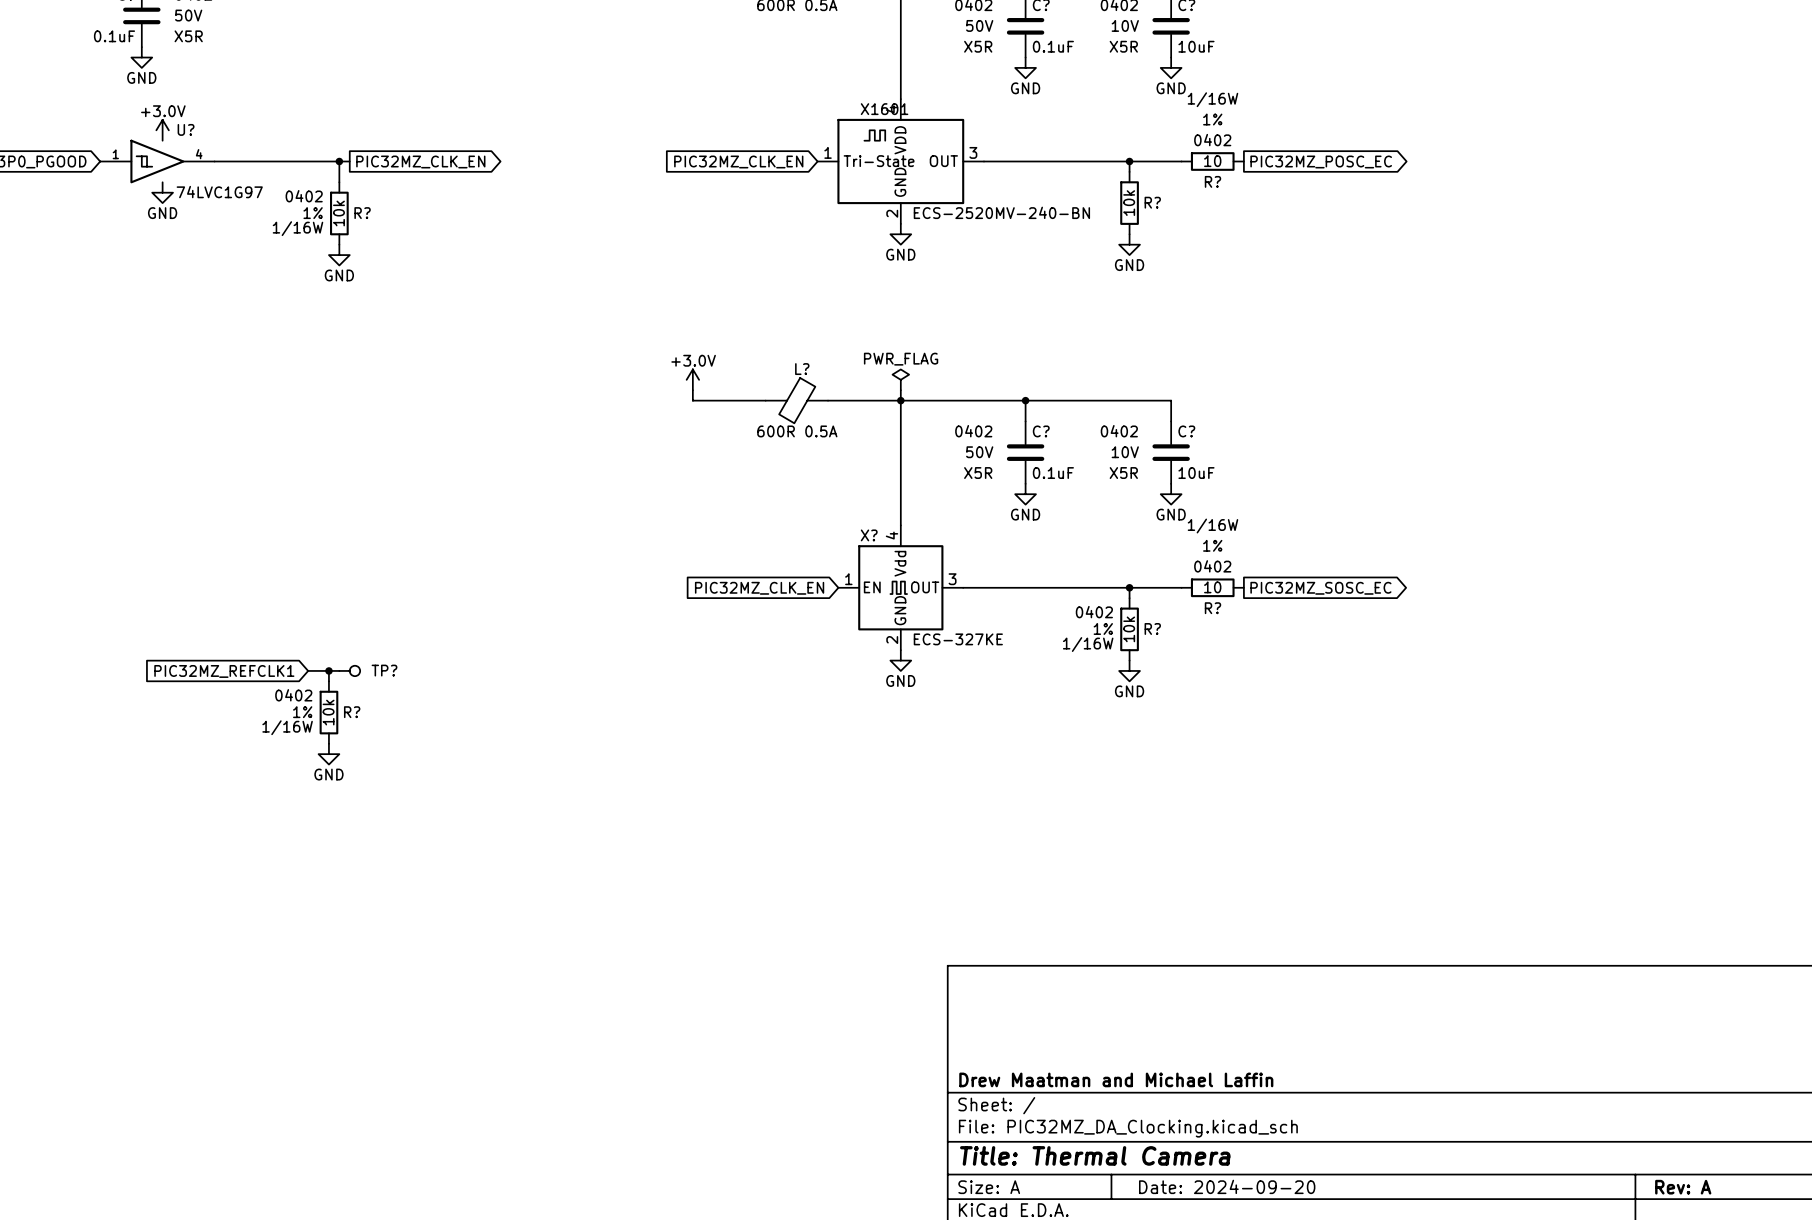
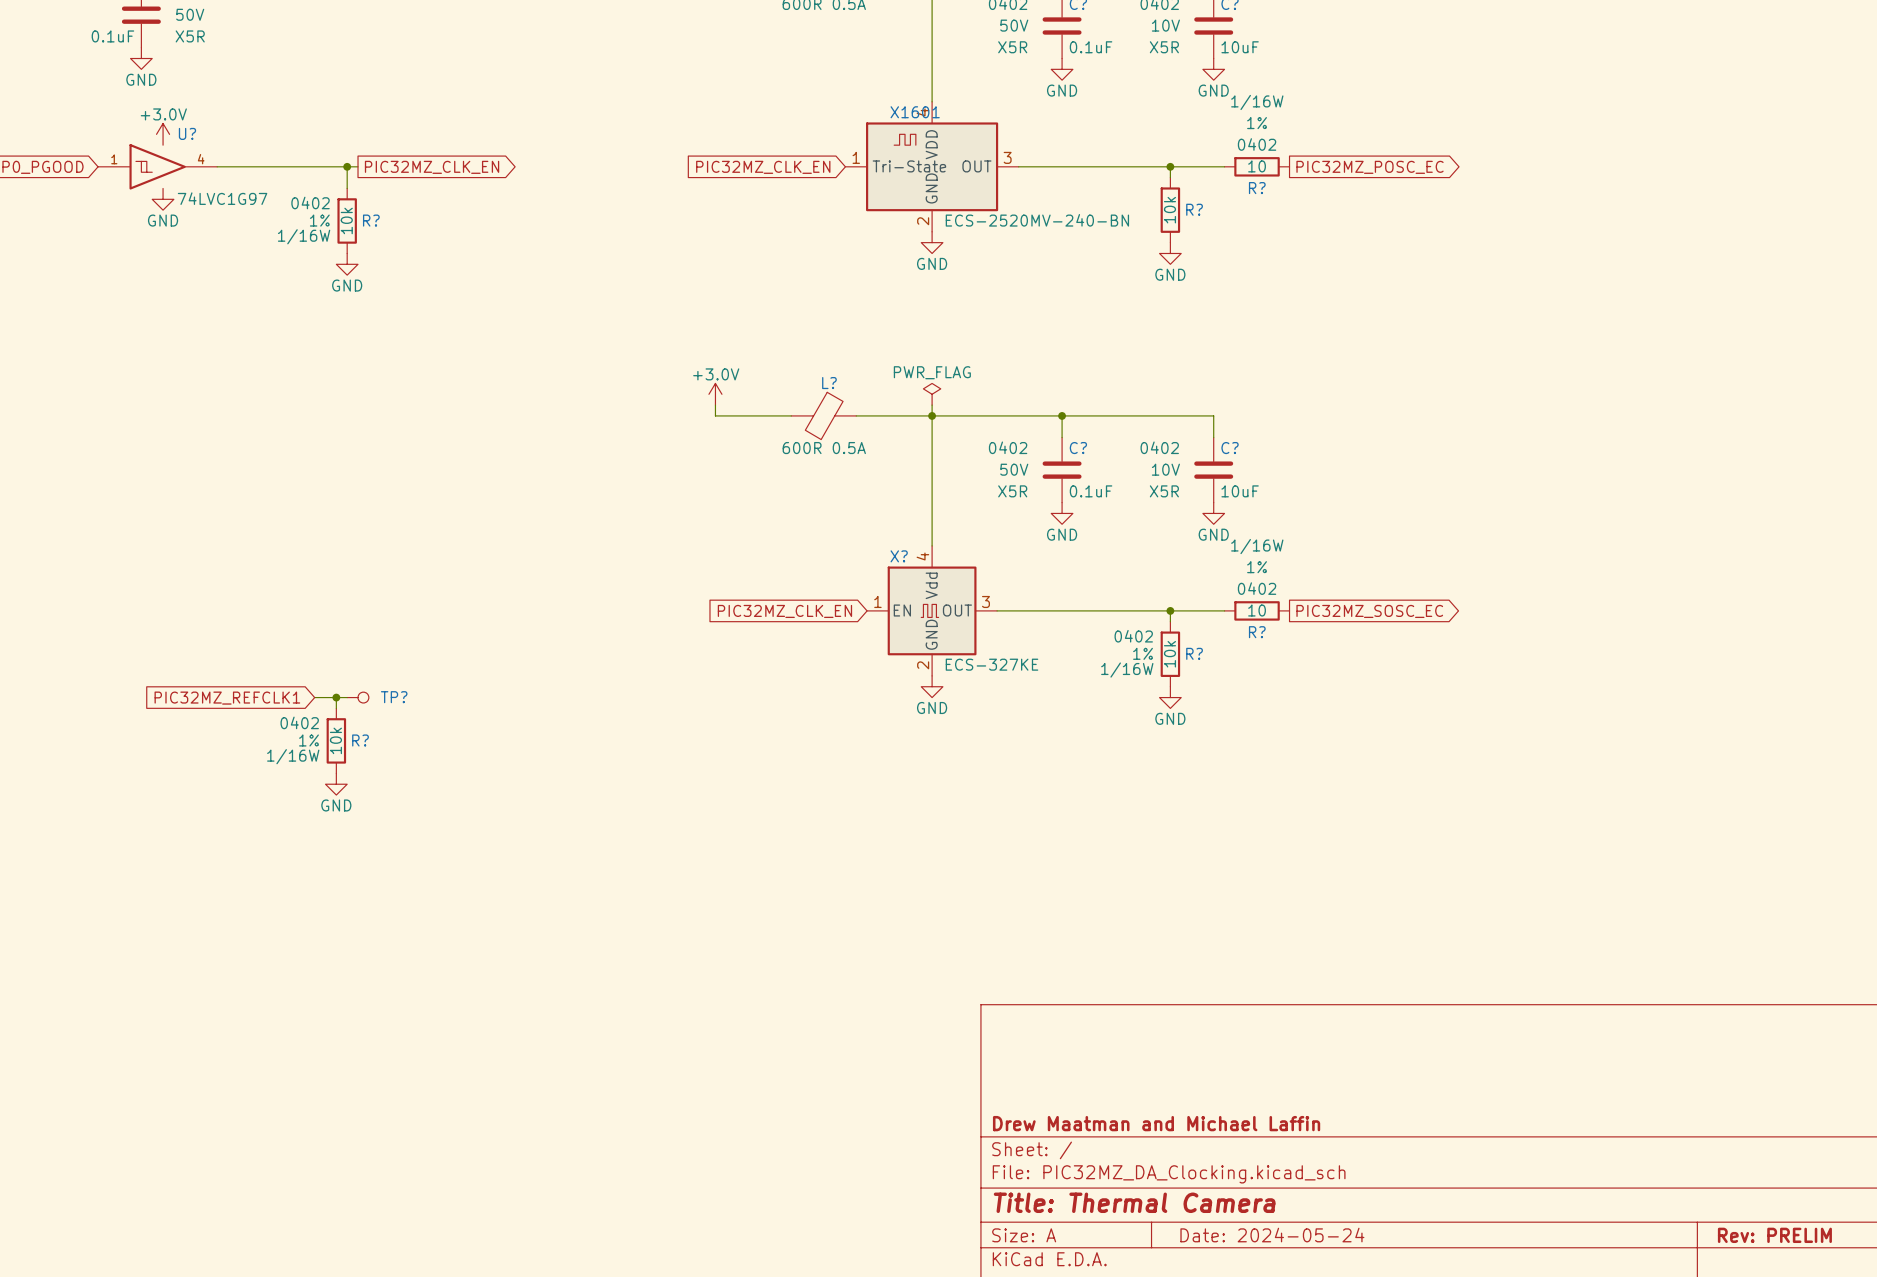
title block: Date: 2024-09-20 (1227, 1186) -> Date: 2024-05-24 (1272, 1235)
title block: Rev: A (1683, 1187) -> Rev: PRELIM (1774, 1235)

